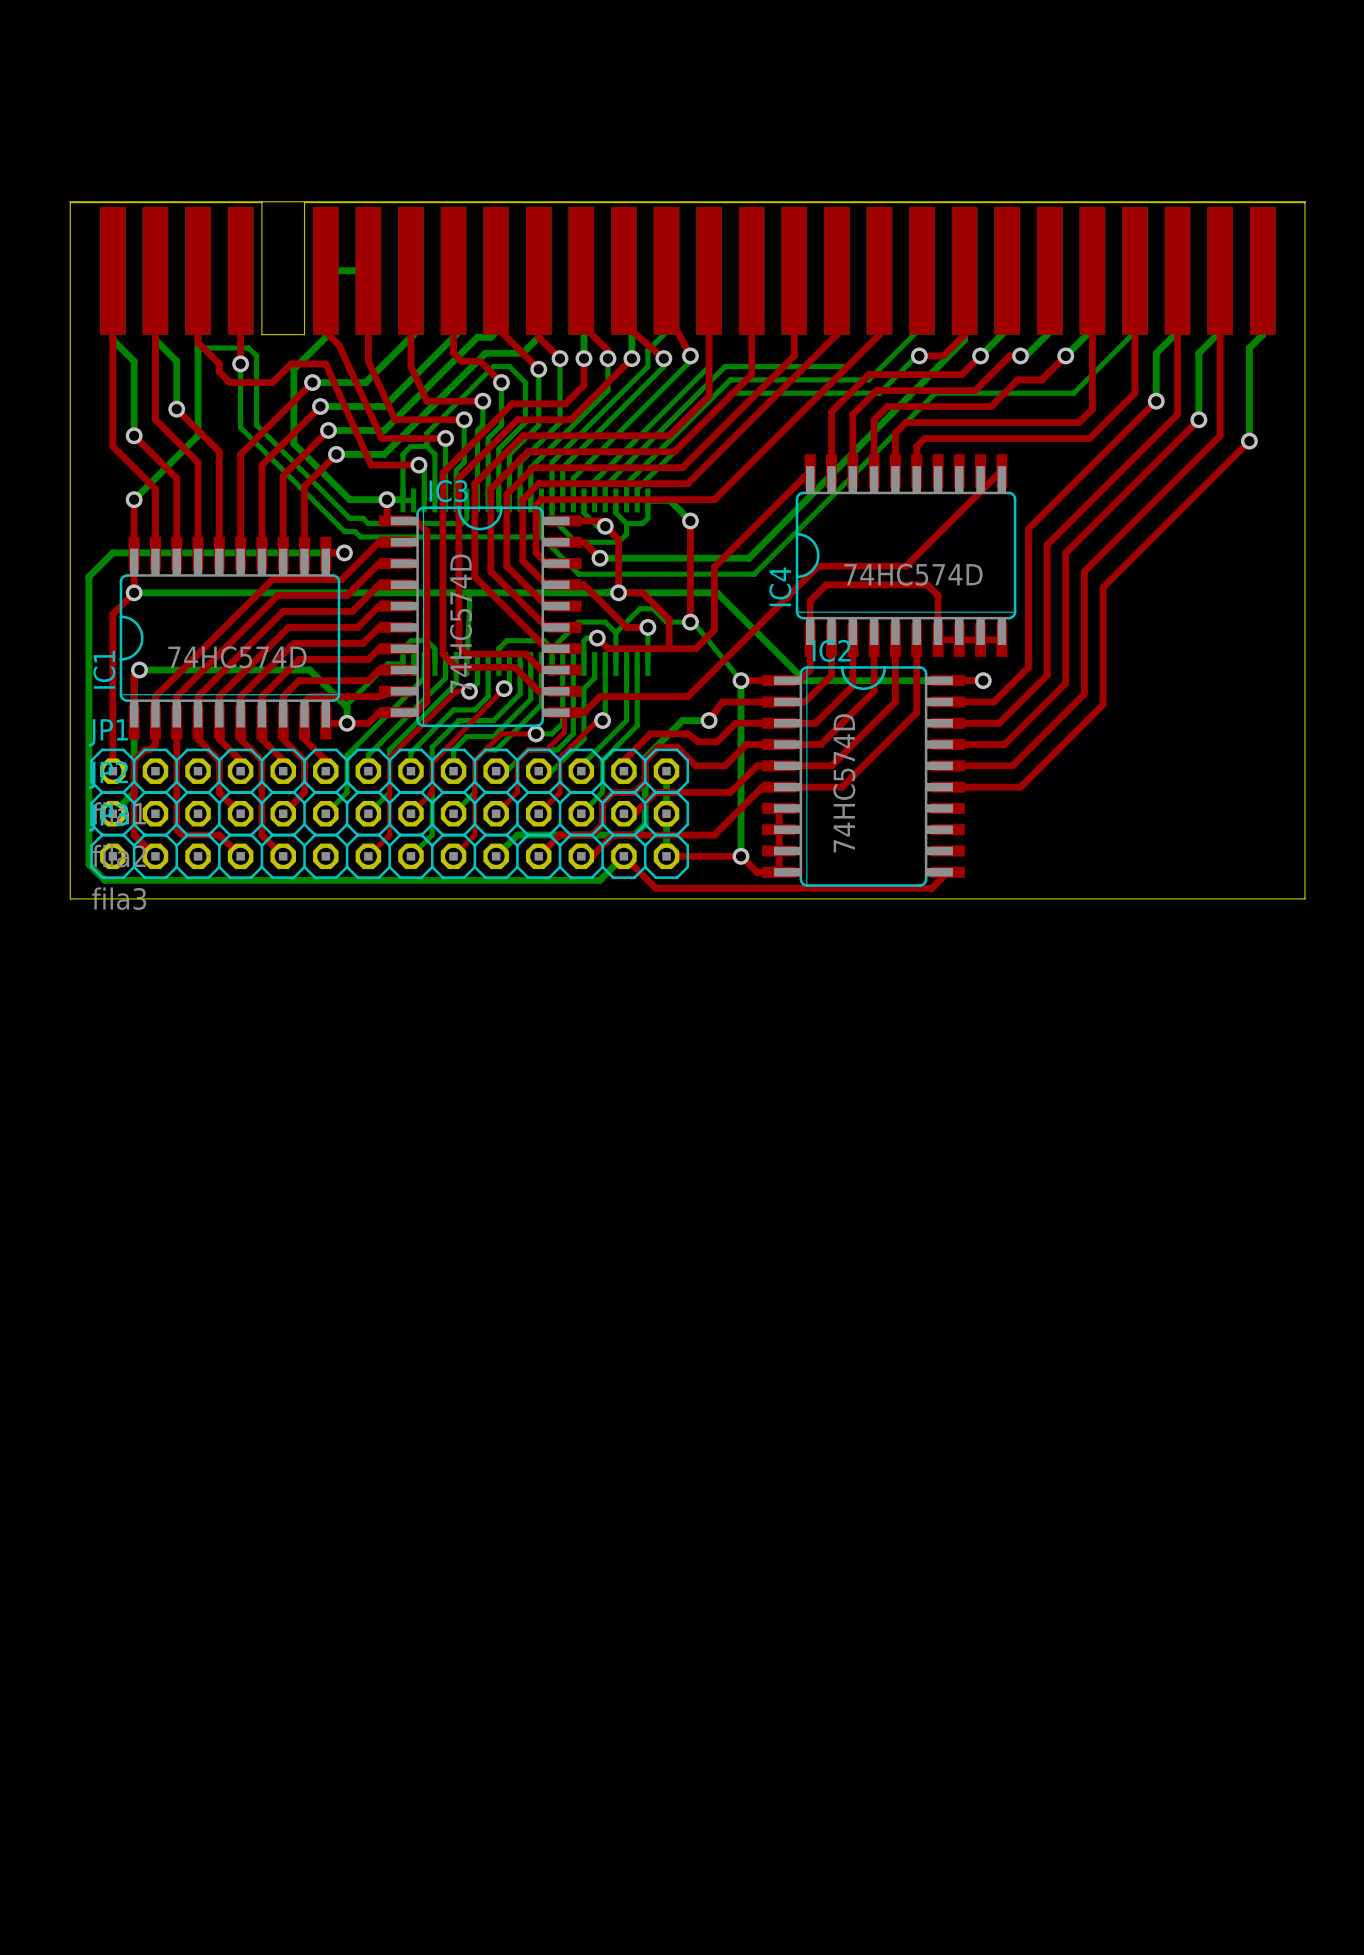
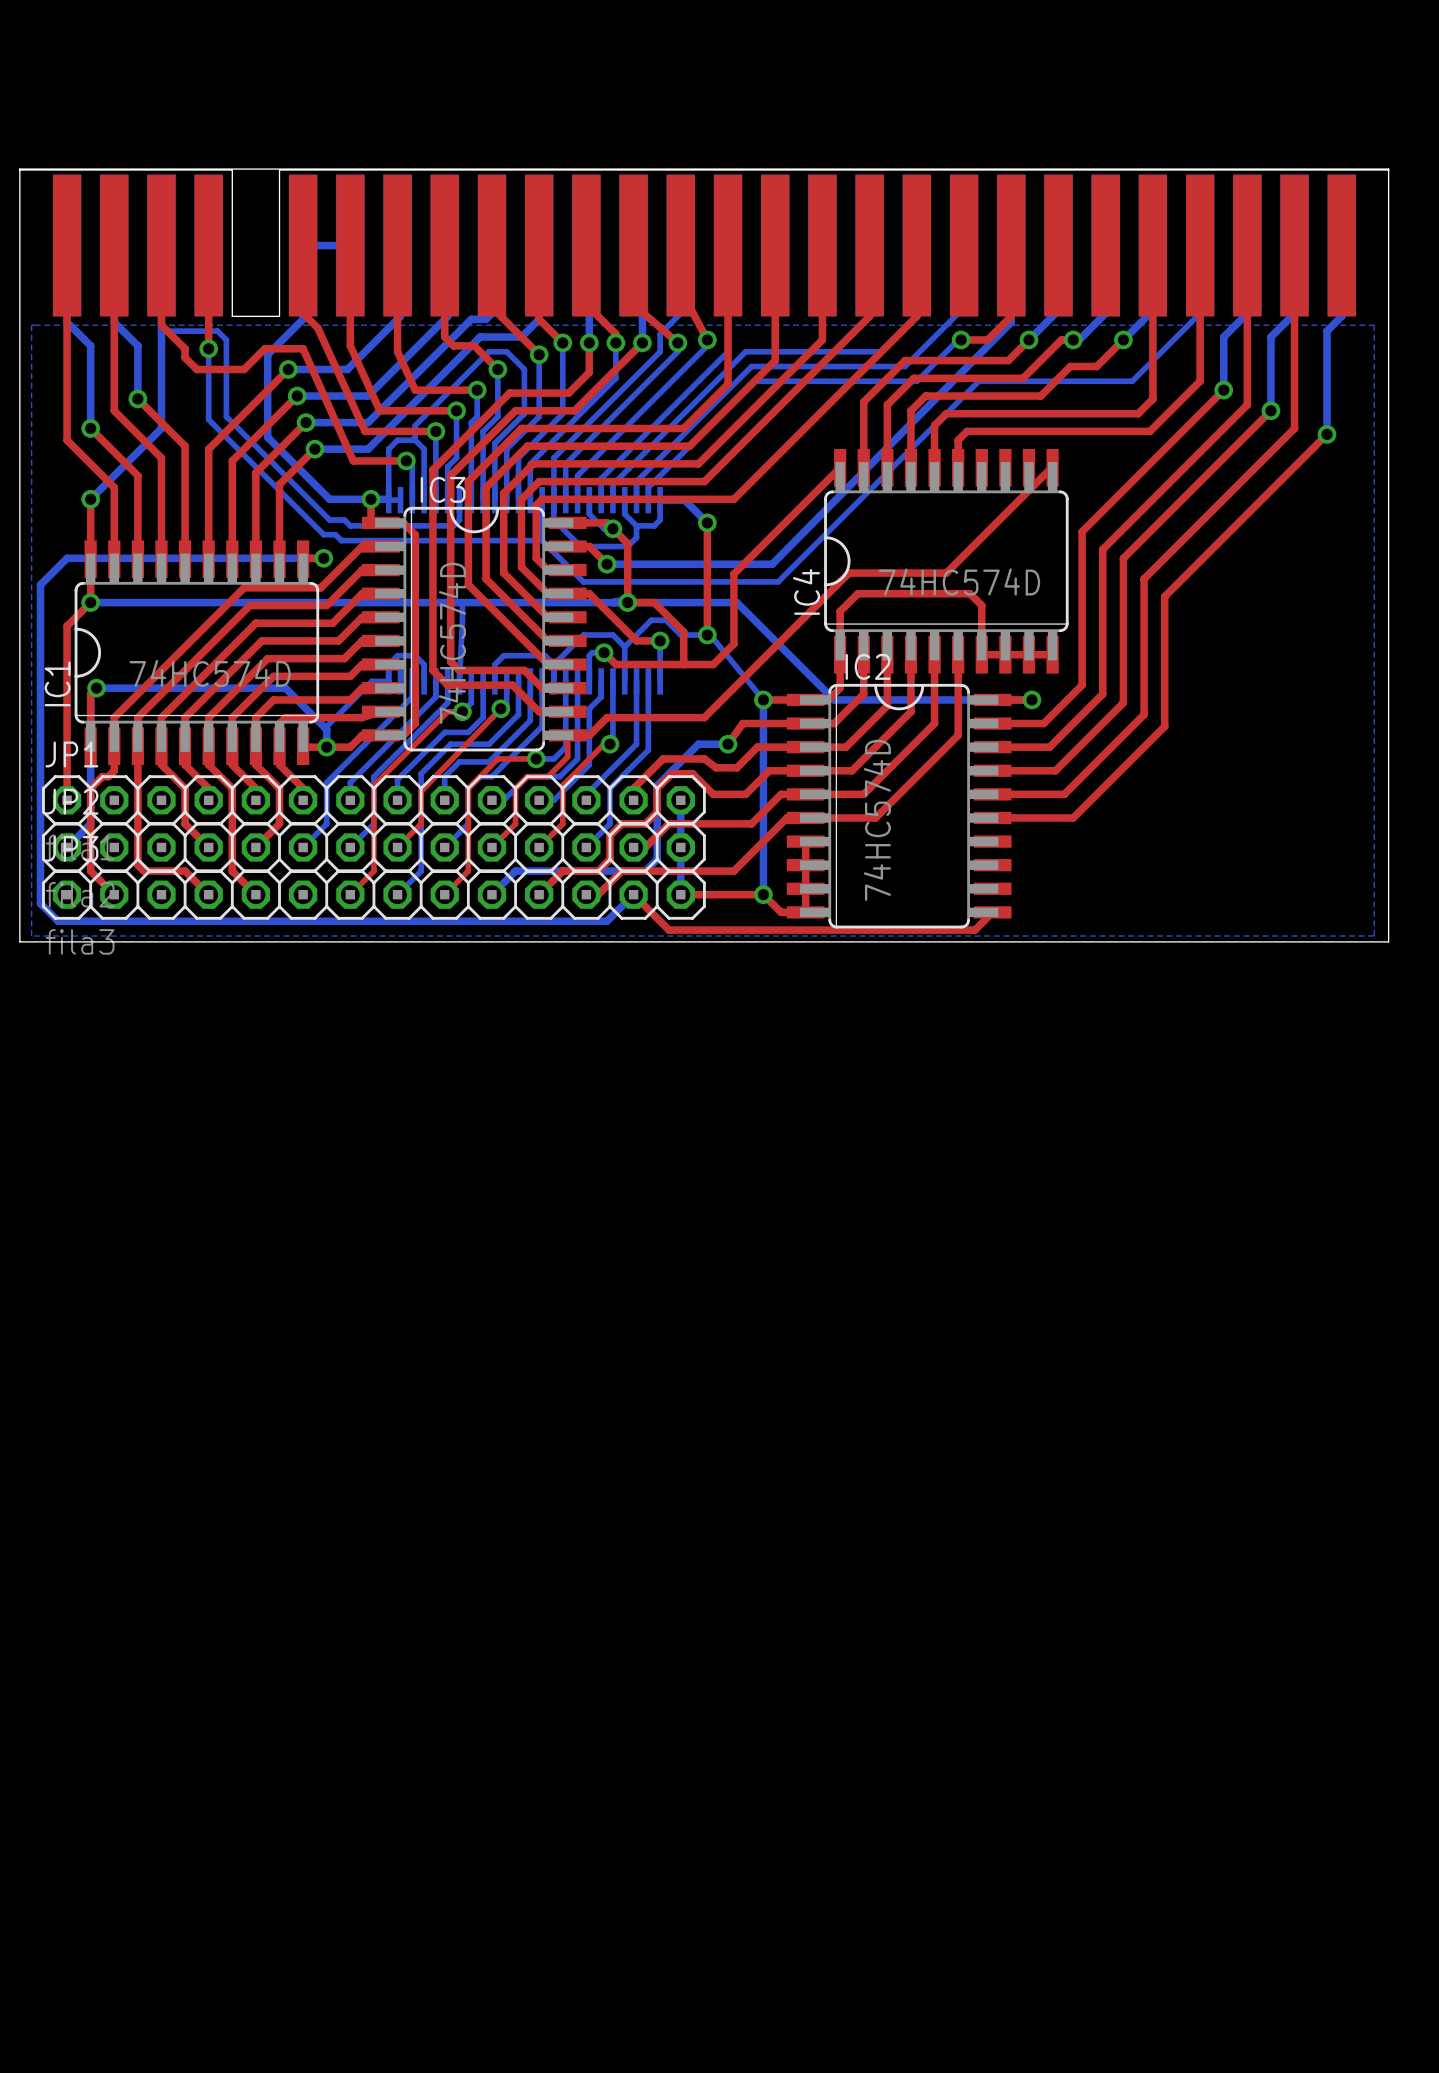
bottom zone outline: none -> (31, 325) (1374, 325) (1374, 936) (31, 936) (31, 325)

